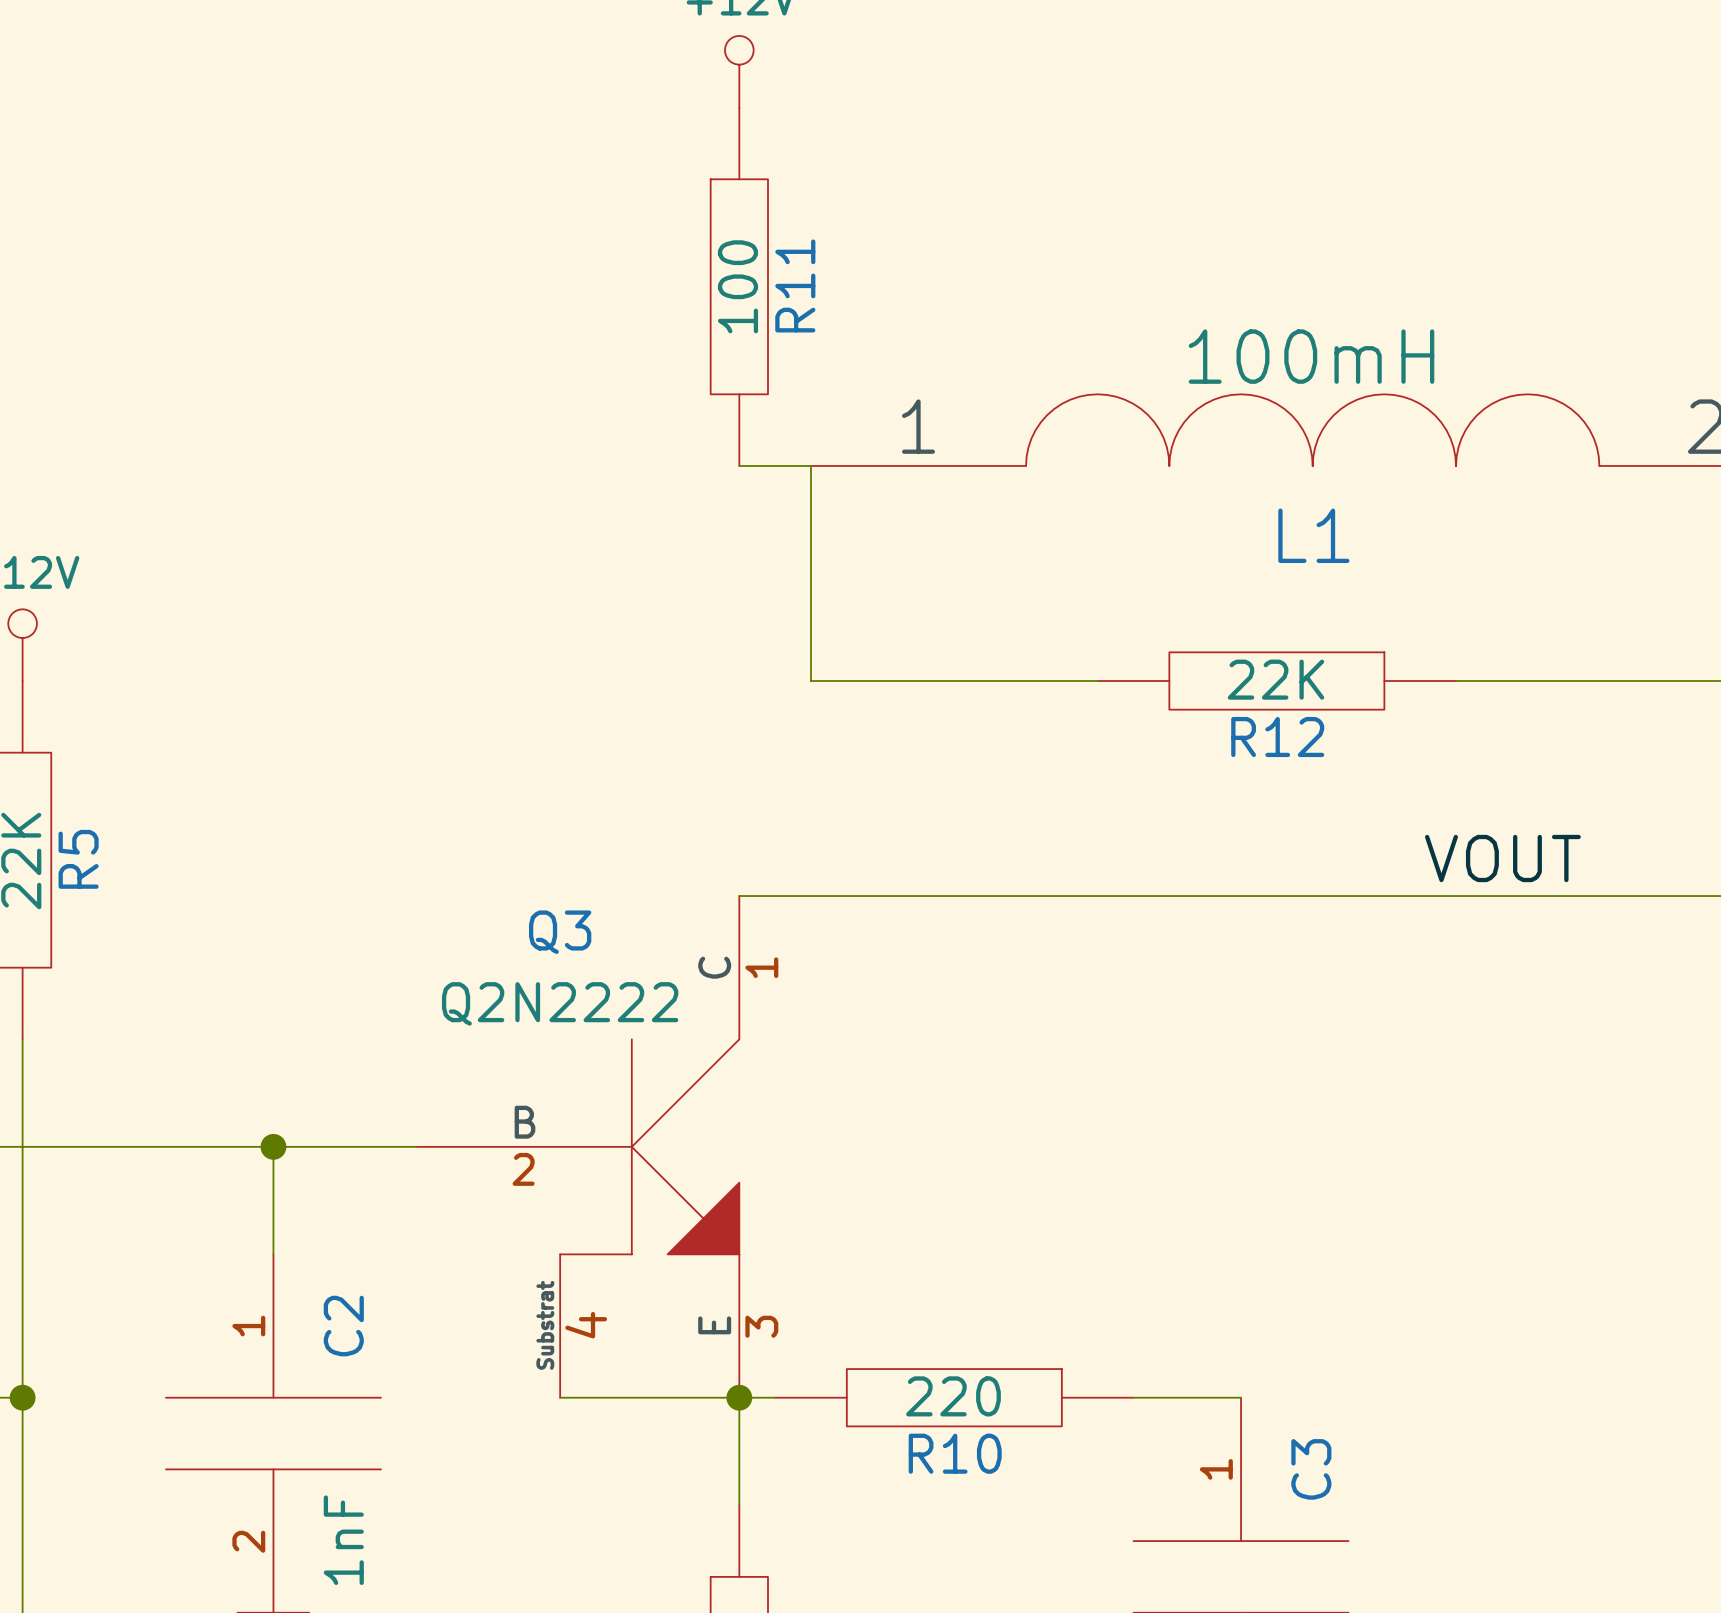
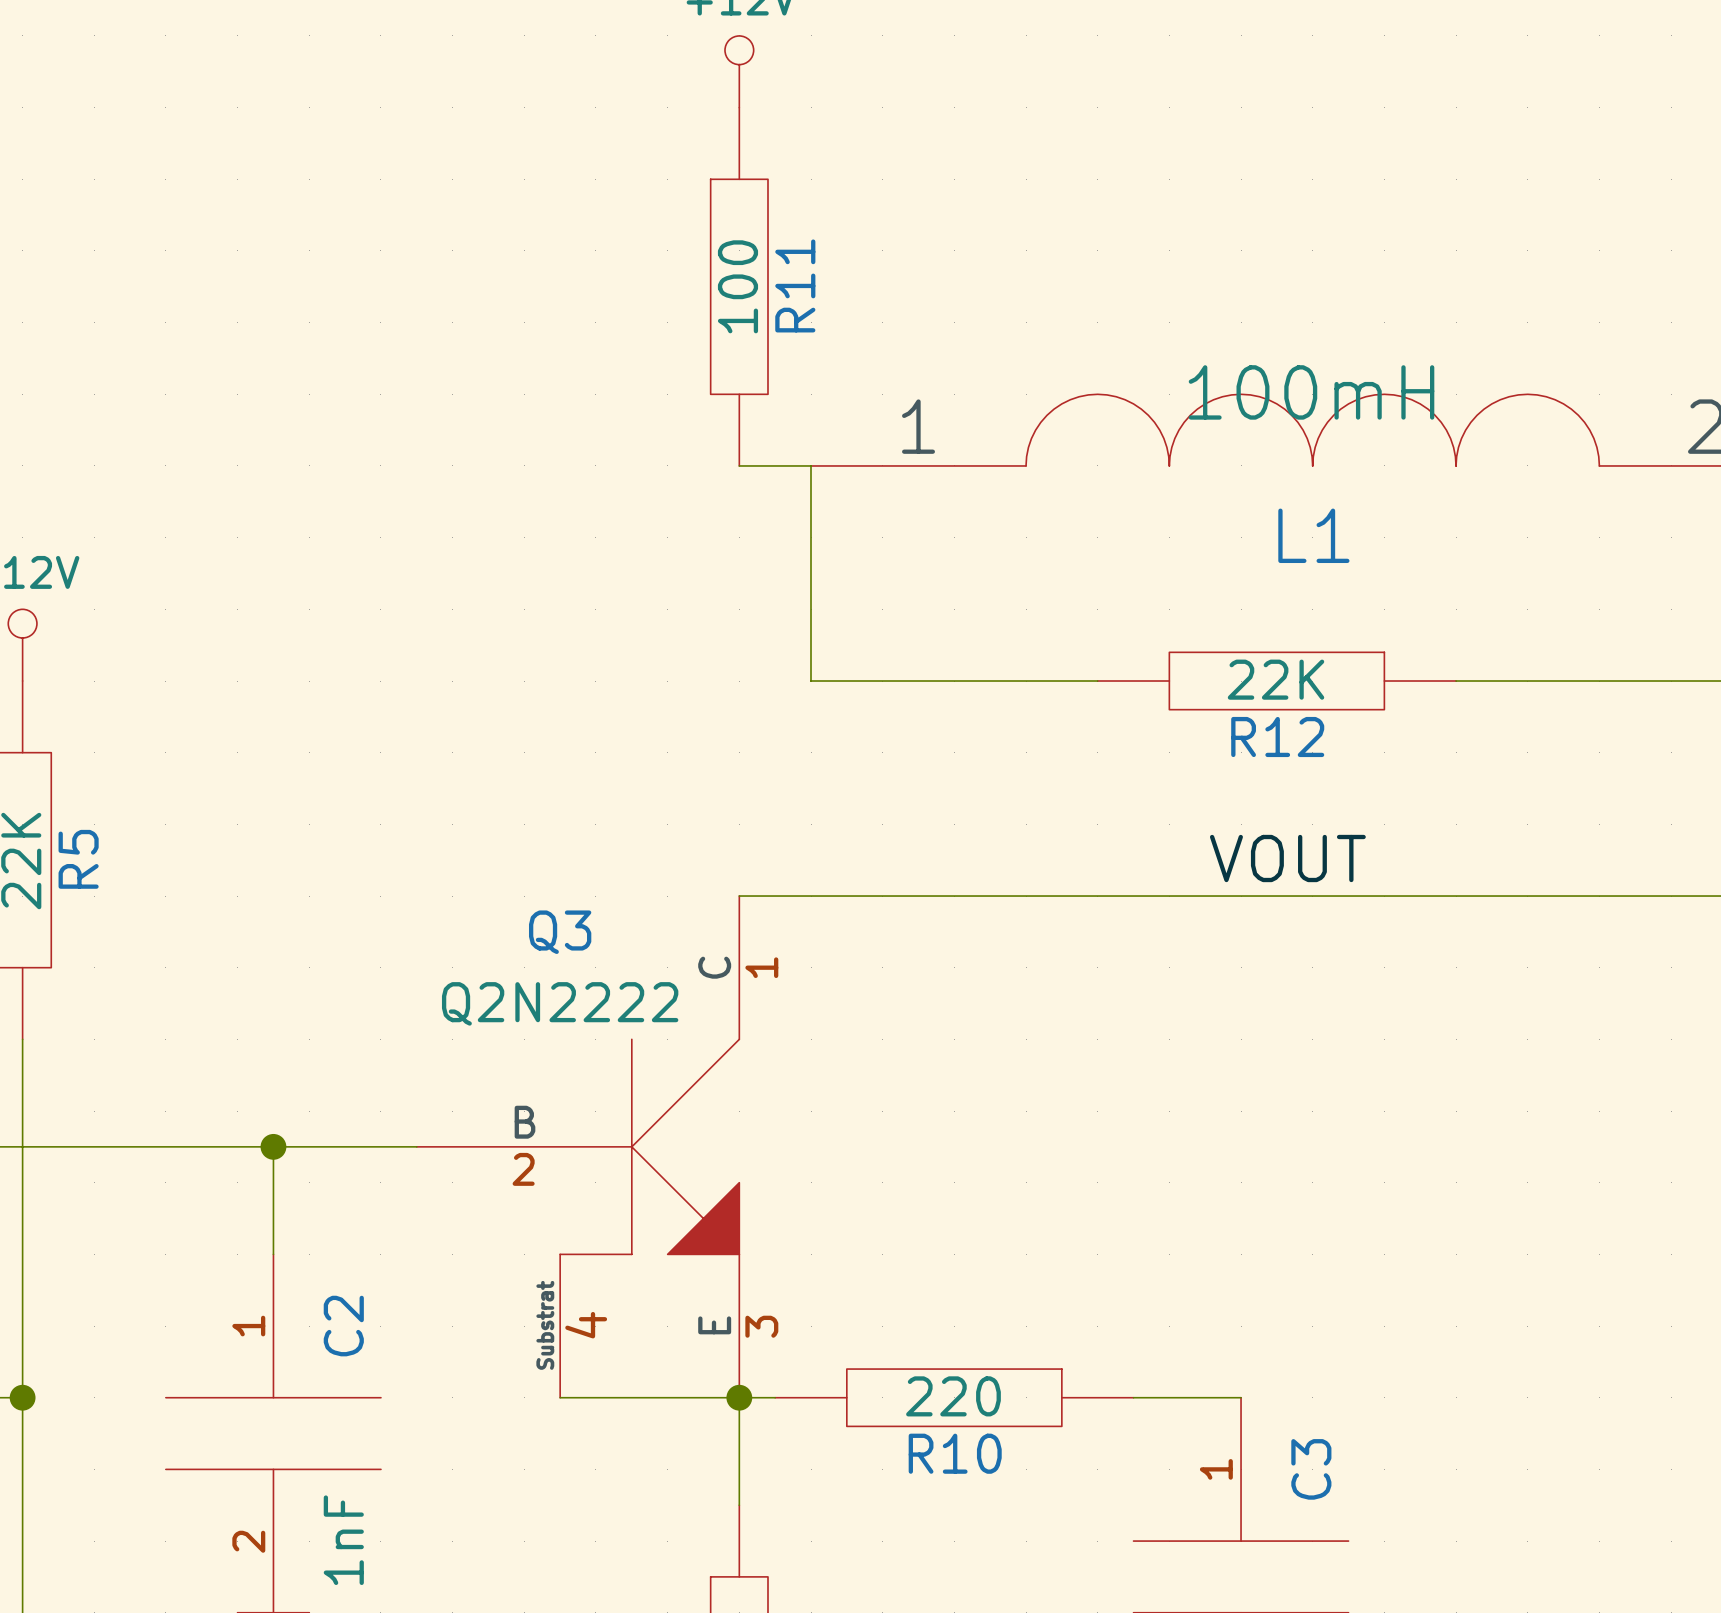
L1 value position: 100mH (1311, 356) -> 100mH (1311, 392)
label position: VOUT (1502, 858) -> VOUT (1287, 858)

